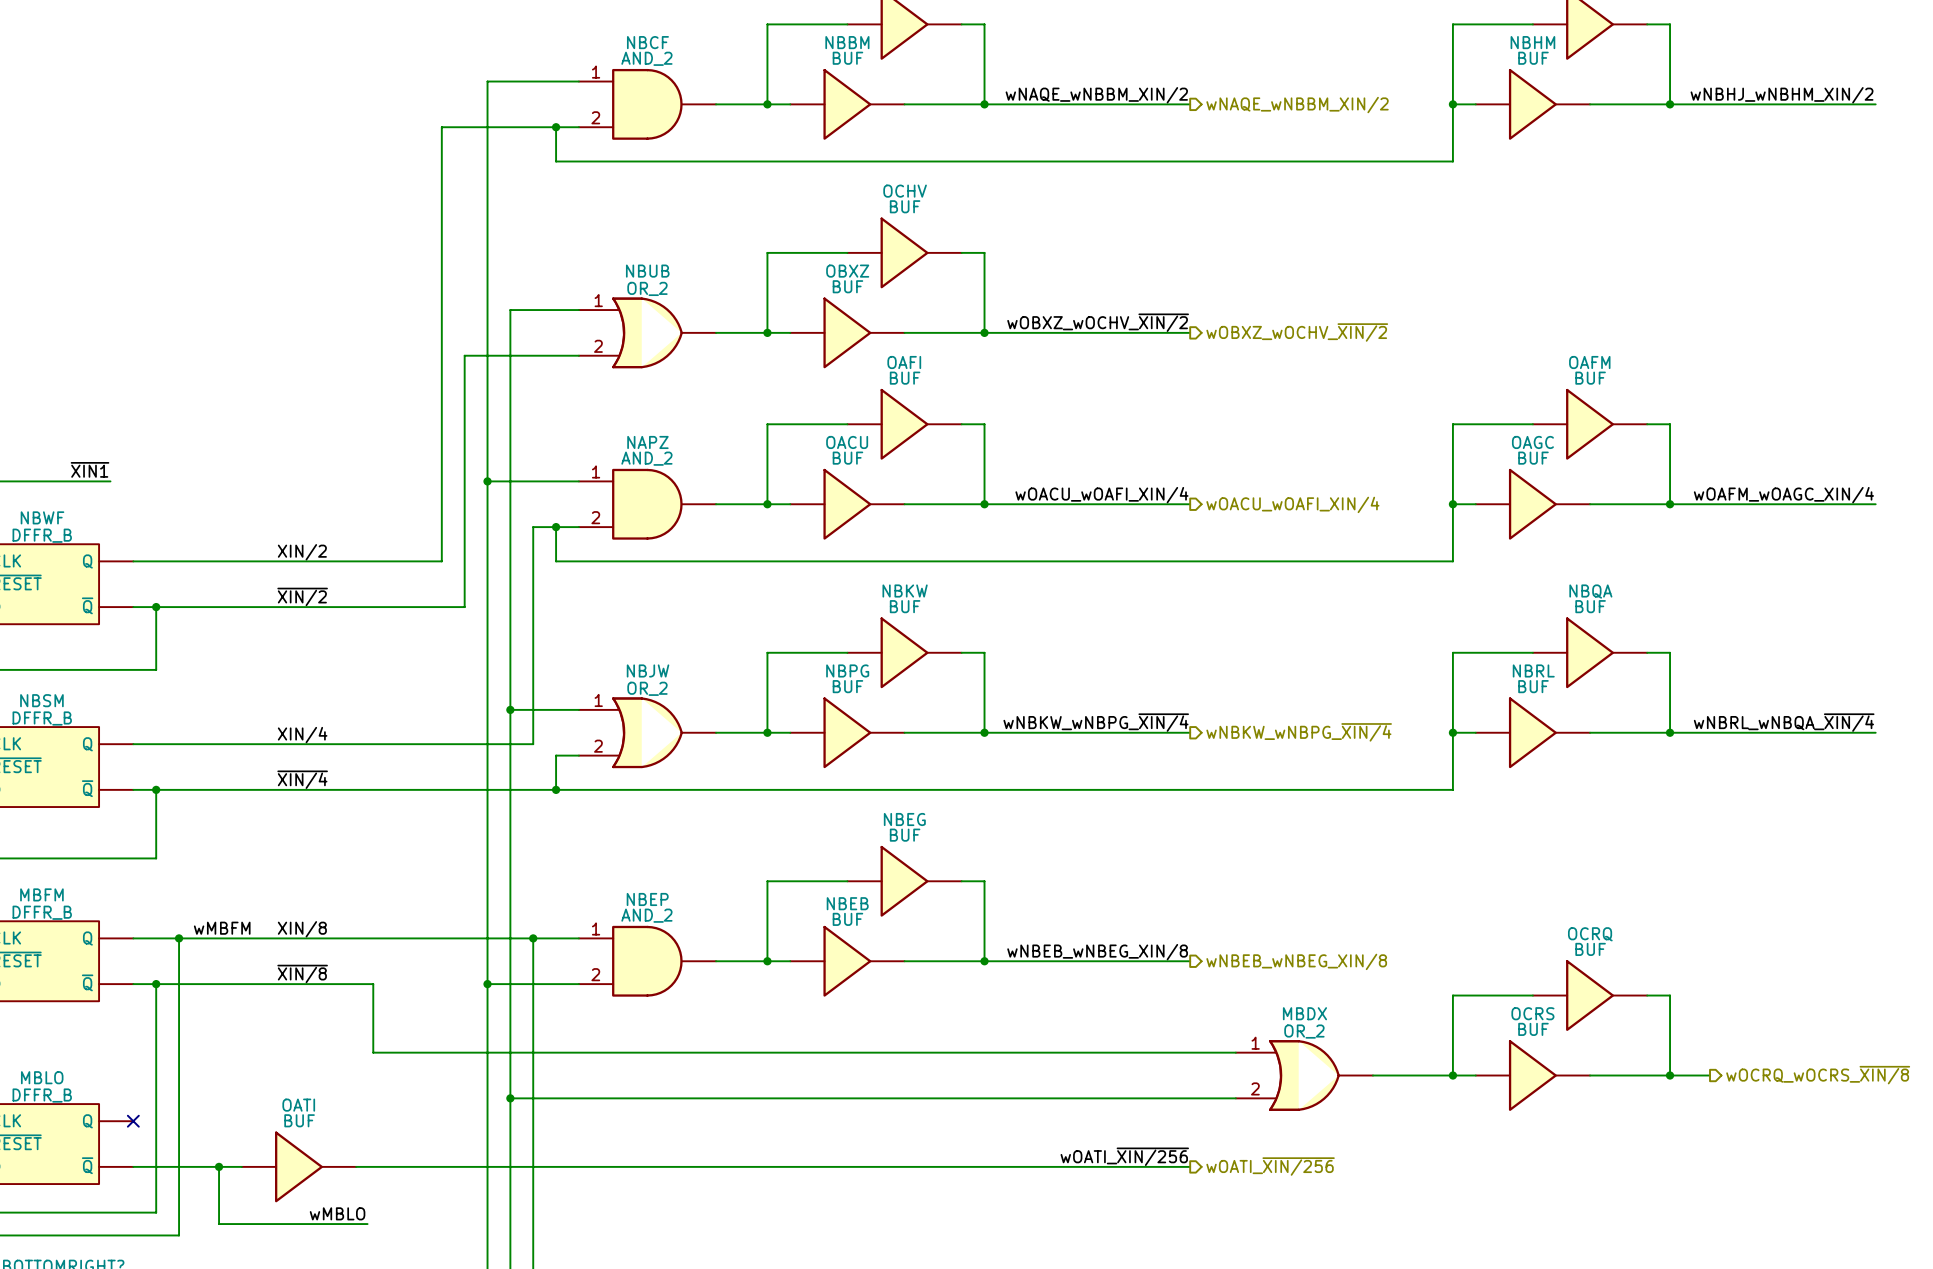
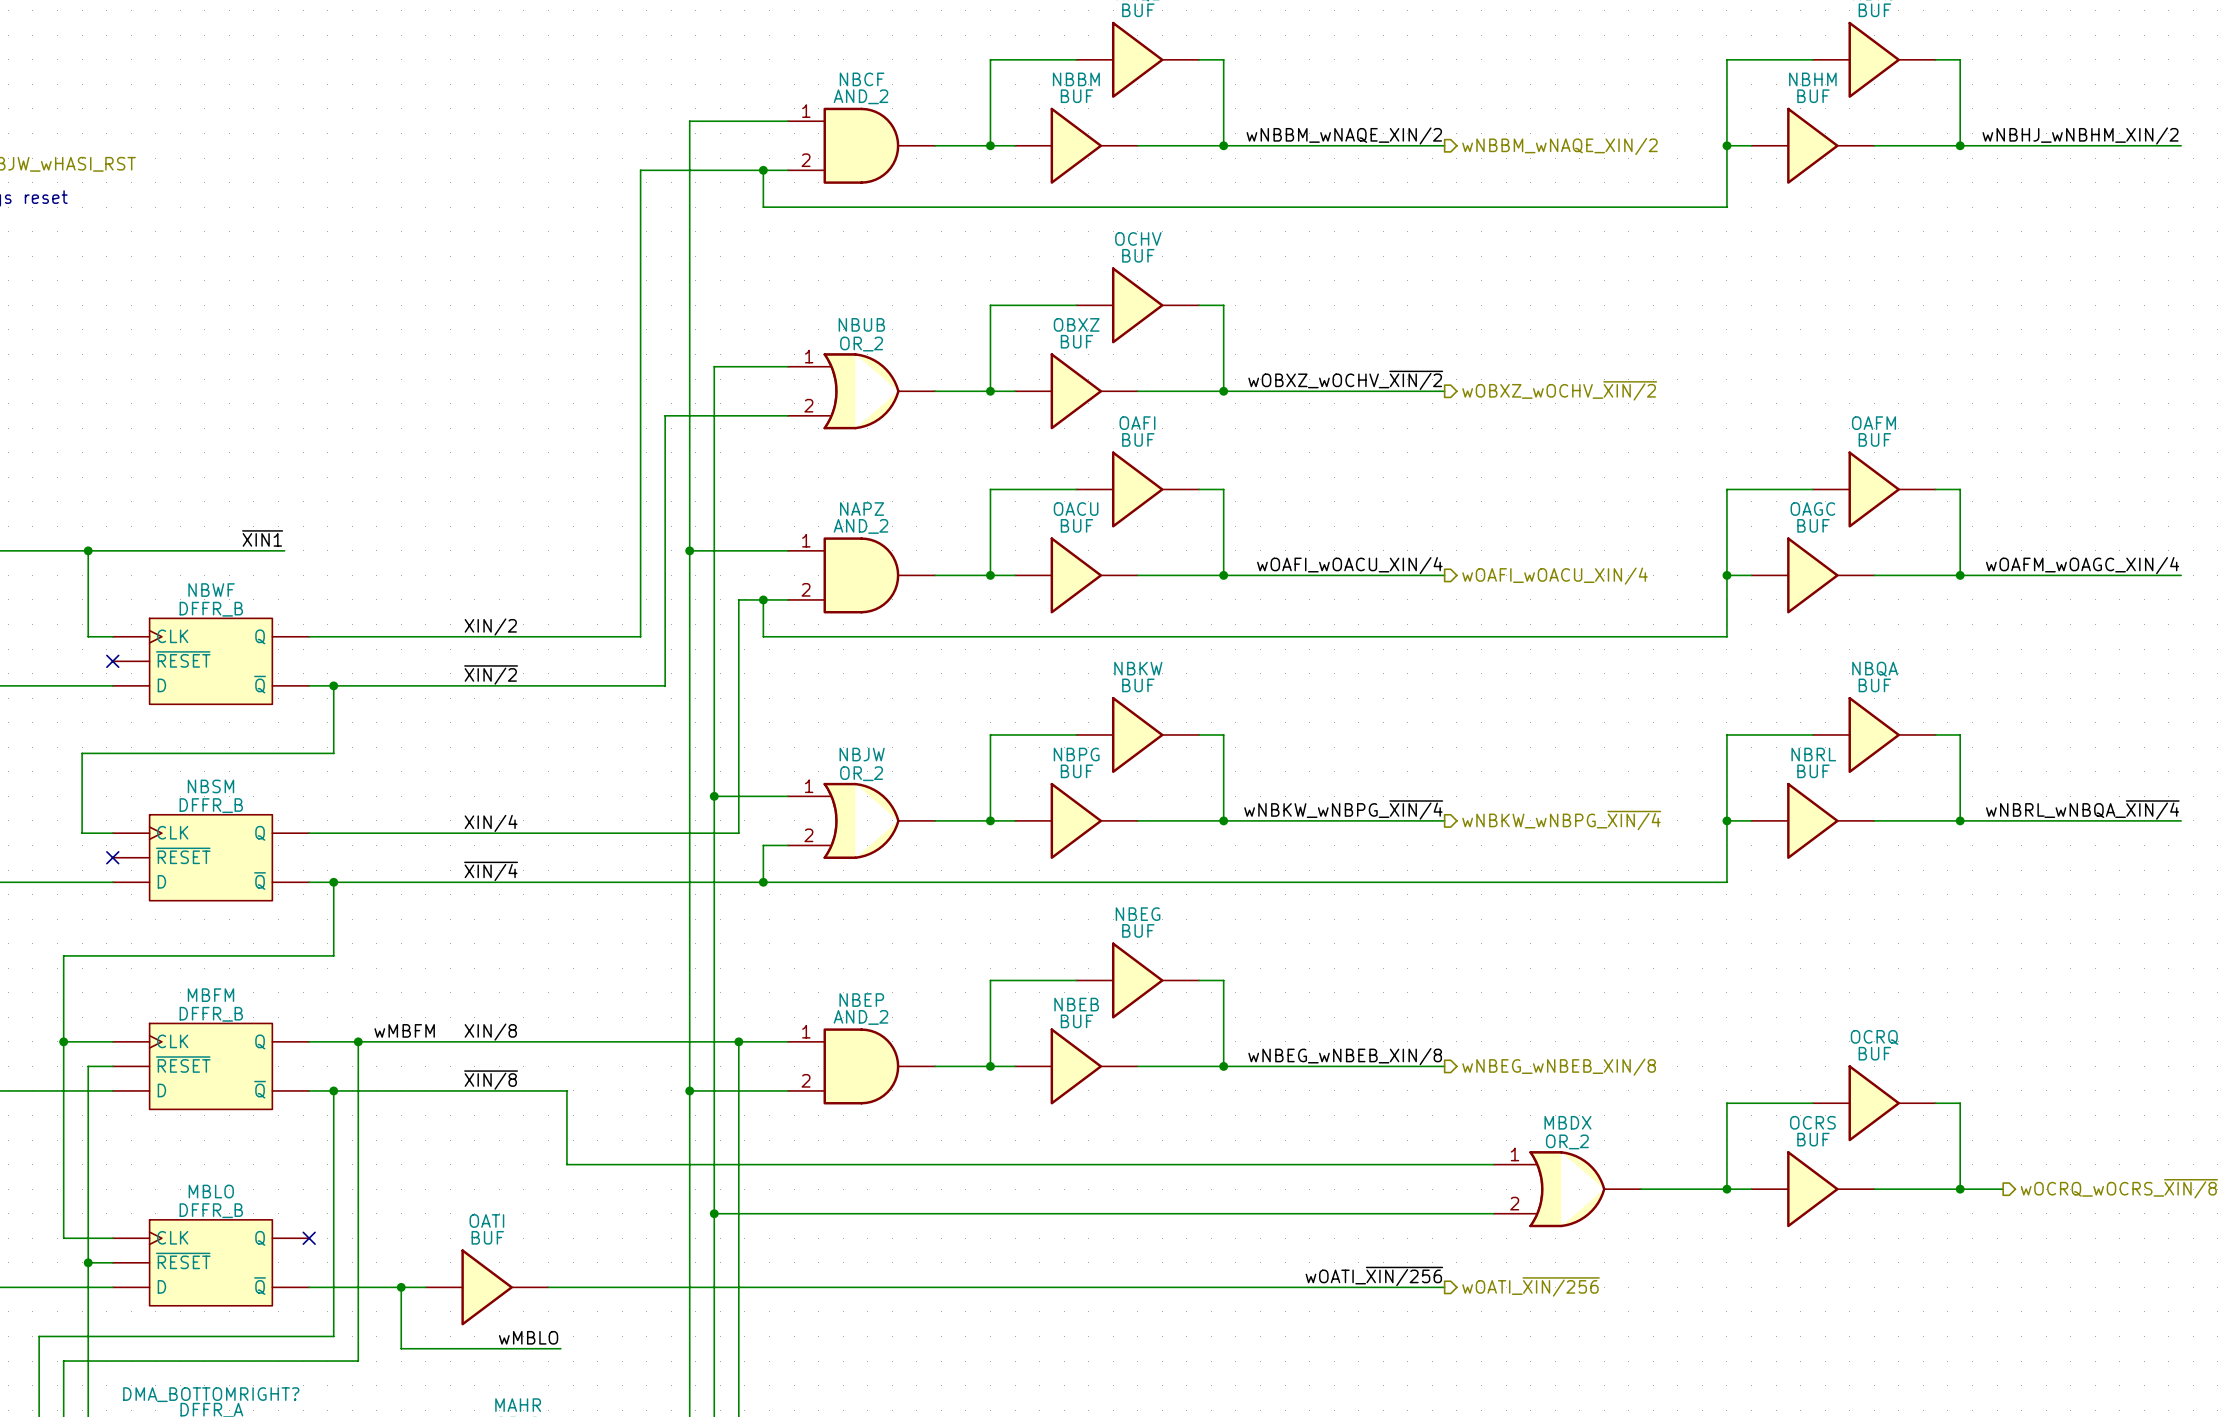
label: wNAQE_wNBBM_XIN/2 (1096, 95) -> wNBBM_wNAQE_XIN/2 (1344, 135)
hierarchical label: wNAQE_wNBBM_XIN/2 (1297, 105) -> wNBBM_wNAQE_XIN/2 (1559, 146)
label: wOACU_wOAFI_XIN/4 (1101, 495) -> wOAFI_wOACU_XIN/4 (1349, 565)
hierarchical label: wOACU_wOAFI_XIN/4 (1292, 504) -> wOAFI_wOACU_XIN/4 (1555, 576)
label: wNBEB_wNBEG_XIN/8 (1097, 952) -> wNBEG_wNBEB_XIN/8 (1345, 1056)
hierarchical label: wNBEB_wNBEG_XIN/8 (1296, 961) -> wNBEG_wNBEB_XIN/8 (1559, 1067)

